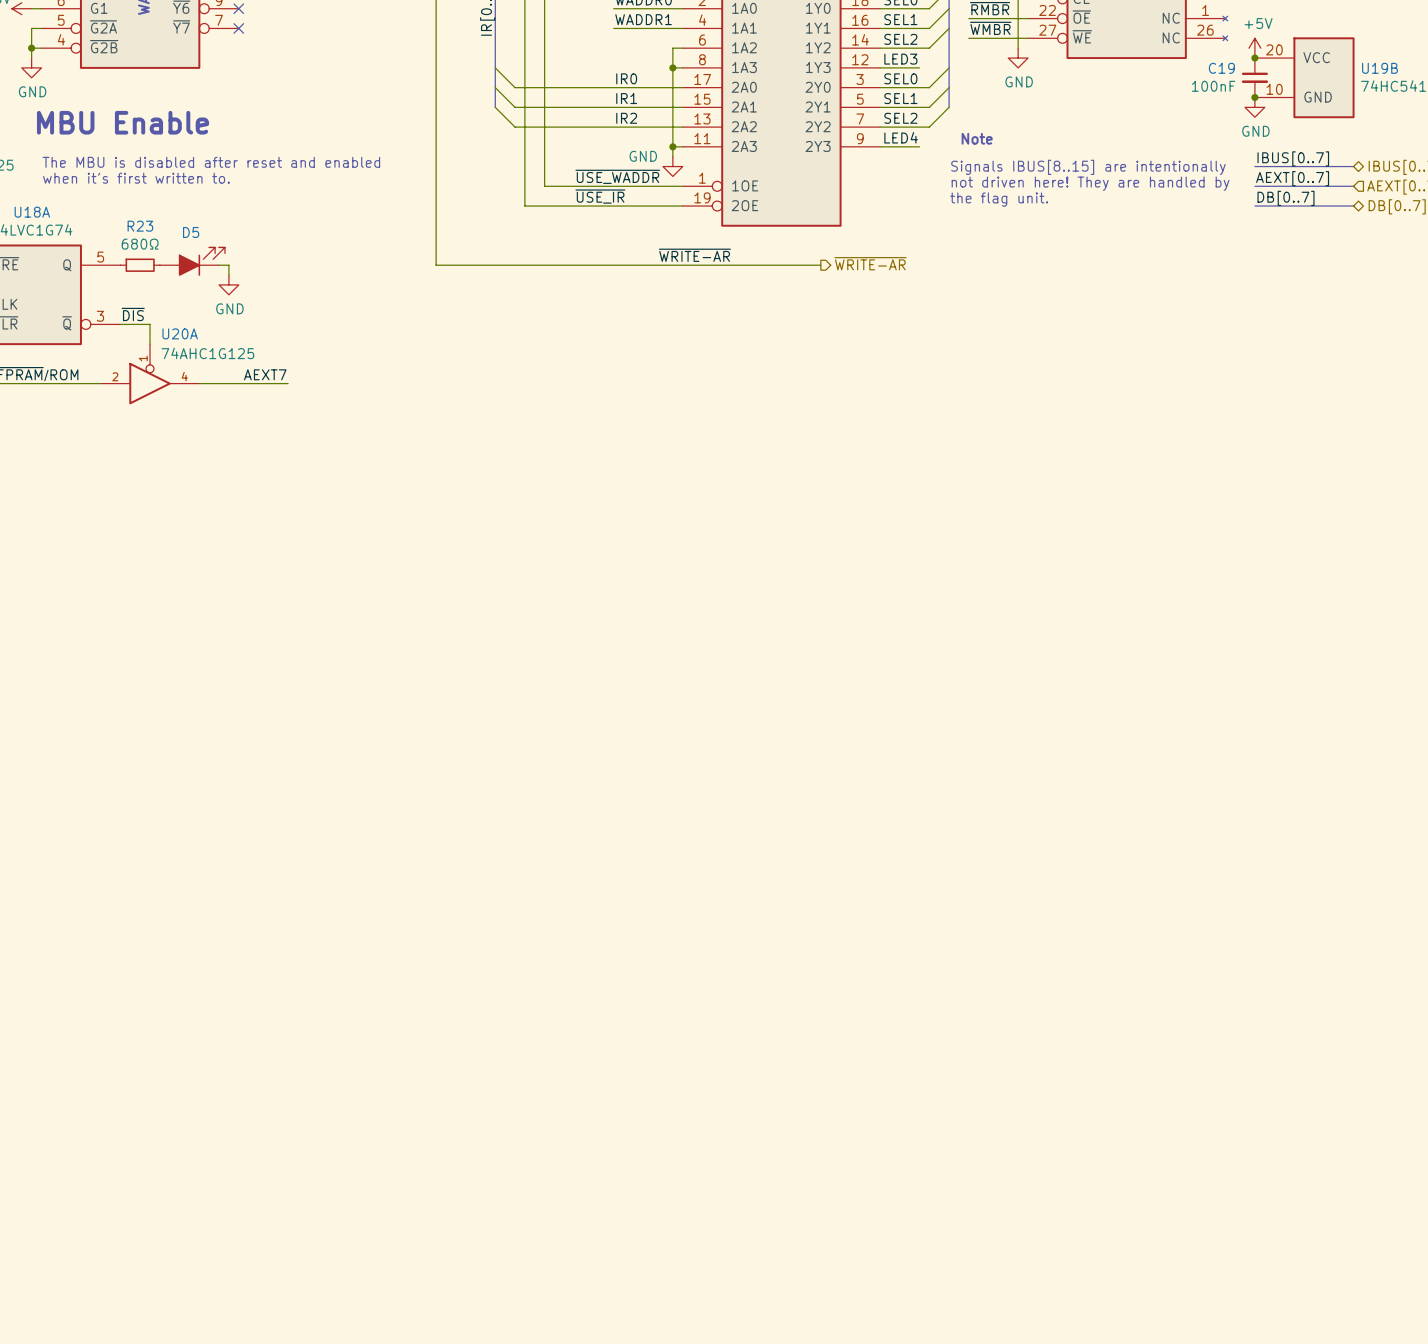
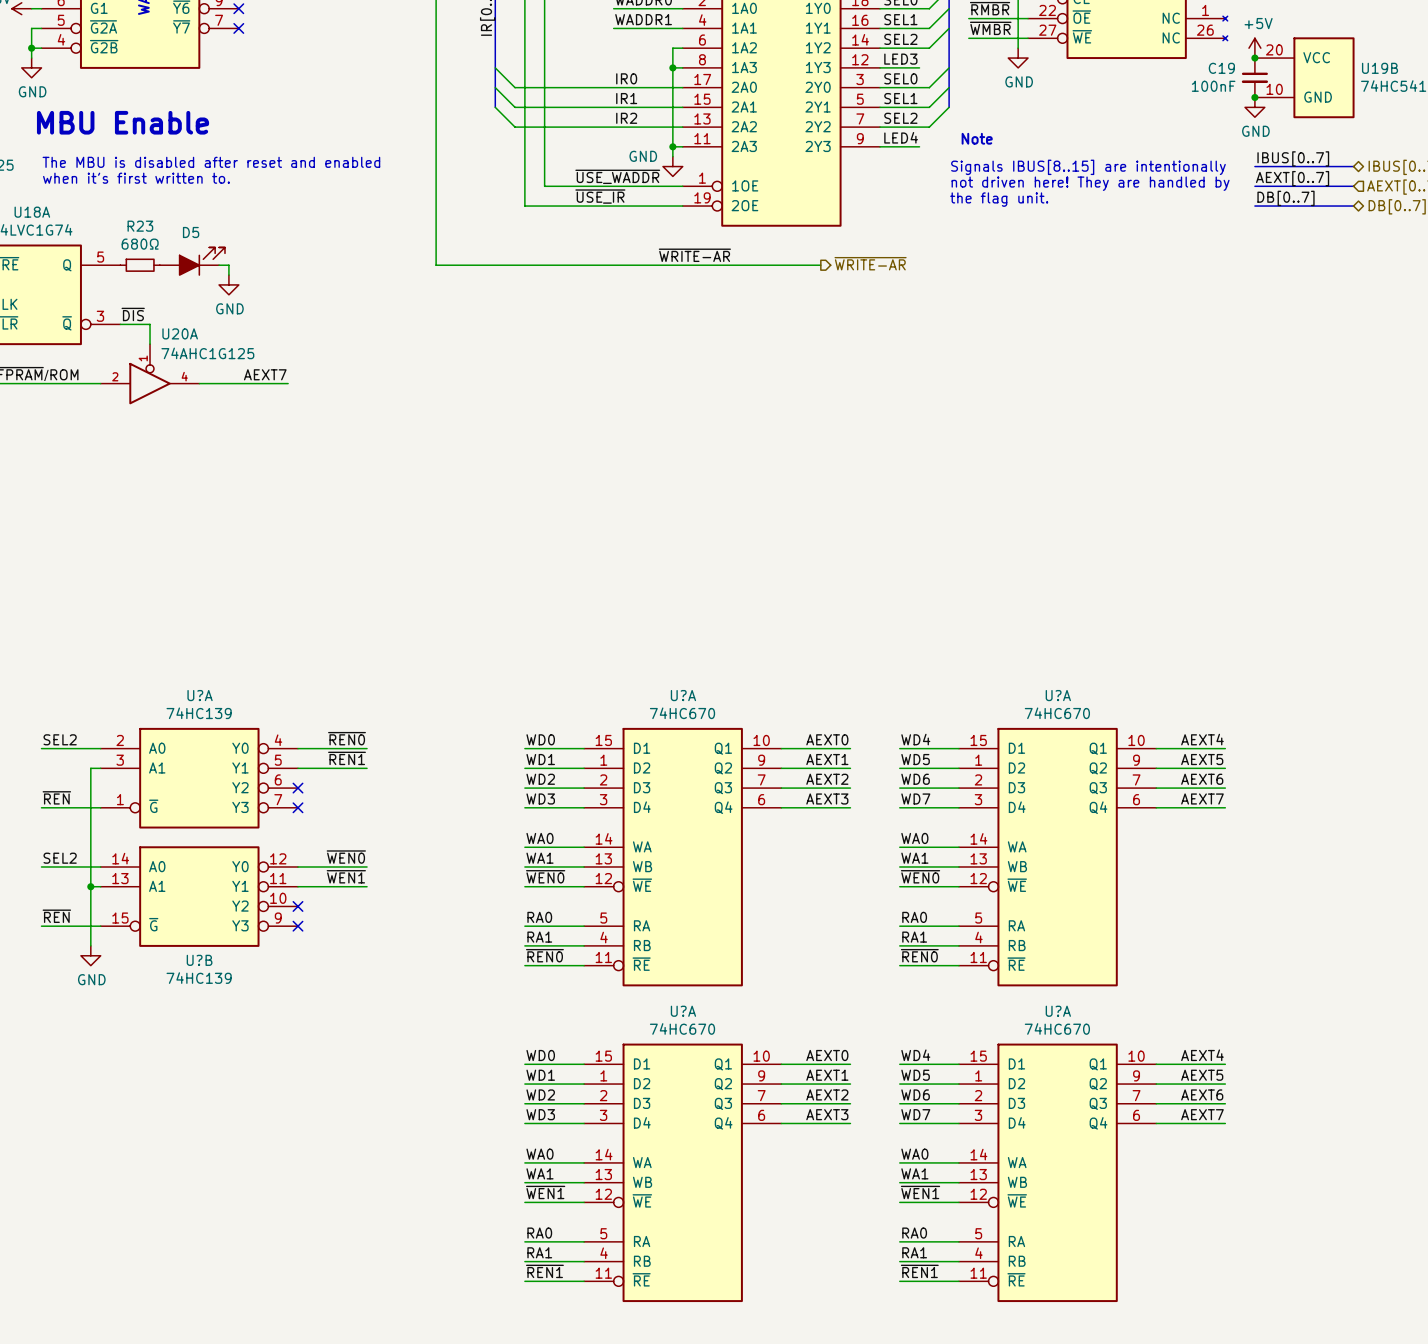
label: none -> ~{REN0} (347, 738)
label: none -> SEL2 (60, 739)
label: none -> WD0 (540, 739)
label: none -> AEXT0 (827, 739)
label: none -> WD4 (915, 739)
label: none -> AEXT4 (1202, 739)
wire: none -> (41, 748) (100, 748)
wire: none -> (297, 748) (367, 748)
wire: none -> (524, 748) (584, 748)
wire: none -> (781, 748) (850, 748)
wire: none -> (899, 748) (958, 748)
wire: none -> (1156, 748) (1225, 748)
label: none -> ~{REN1} (347, 758)
label: none -> WD1 (540, 759)
label: none -> AEXT1 (827, 759)
label: none -> WD5 (915, 759)
label: none -> AEXT5 (1202, 759)
wire: none -> (100, 768) (90, 768) (90, 945)
wire: none -> (297, 768) (367, 768)
wire: none -> (524, 768) (584, 768)
wire: none -> (781, 768) (850, 768)
wire: none -> (899, 768) (958, 768)
wire: none -> (1156, 768) (1225, 768)
U?A: none -> 74HC139 (199, 778)
label: none -> WD2 (540, 779)
label: none -> AEXT2 (827, 779)
label: none -> WD6 (915, 779)
label: none -> AEXT6 (1202, 779)
no-connect mark: none -> (297, 788)
wire: none -> (524, 788) (584, 788)
wire: none -> (781, 788) (850, 788)
wire: none -> (899, 788) (958, 788)
wire: none -> (1156, 788) (1225, 788)
label: none -> ~{REN} (56, 797)
label: none -> WD3 (540, 799)
label: none -> AEXT3 (827, 799)
label: none -> WD7 (915, 799)
label: none -> AEXT7 (1202, 799)
wire: none -> (41, 807) (100, 807)
no-connect mark: none -> (297, 807)
wire: none -> (524, 807) (584, 807)
wire: none -> (781, 807) (850, 807)
wire: none -> (899, 807) (958, 807)
wire: none -> (1156, 807) (1225, 807)
label: none -> WA0 (540, 838)
label: none -> WA0 (914, 838)
wire: none -> (524, 847) (584, 847)
wire: none -> (899, 847) (958, 847)
label: none -> ~{WEN0} (346, 857)
U?A: none -> 74HC670 (682, 857)
U?A: none -> 74HC670 (1057, 857)
label: none -> SEL2 (60, 858)
label: none -> WA1 (540, 858)
label: none -> WA1 (914, 858)
wire: none -> (41, 866) (100, 866)
wire: none -> (297, 866) (367, 866)
wire: none -> (524, 866) (584, 866)
wire: none -> (899, 866) (958, 866)
label: none -> ~{WEN1} (346, 876)
label: none -> ~{WEN0} (545, 876)
label: none -> ~{WEN0} (920, 876)
wire: none -> (90, 886) (100, 886)
junction: none -> (90, 886)
wire: none -> (297, 886) (367, 886)
wire: none -> (524, 886) (584, 886)
wire: none -> (899, 886) (958, 886)
U?B: none -> 74HC139 (199, 896)
no-connect mark: none -> (297, 906)
label: none -> ~{REN} (56, 916)
label: none -> RA0 (539, 917)
label: none -> RA0 (914, 917)
wire: none -> (41, 926) (100, 926)
no-connect mark: none -> (297, 926)
wire: none -> (524, 926) (584, 926)
wire: none -> (899, 926) (958, 926)
label: none -> RA1 (539, 937)
label: none -> RA1 (914, 937)
wire: none -> (524, 945) (584, 945)
wire: none -> (899, 945) (958, 945)
power symbol: none -> GND (90, 955)
label: none -> ~{REN0} (544, 955)
label: none -> ~{REN0} (919, 955)
wire: none -> (524, 965) (584, 965)
wire: none -> (899, 965) (958, 965)
label: none -> WD0 (540, 1055)
label: none -> AEXT0 (827, 1055)
label: none -> WD4 (915, 1055)
label: none -> AEXT4 (1202, 1055)
wire: none -> (524, 1064) (584, 1064)
wire: none -> (781, 1064) (850, 1064)
wire: none -> (899, 1064) (958, 1064)
wire: none -> (1156, 1064) (1225, 1064)
label: none -> WD1 (540, 1075)
label: none -> AEXT1 (827, 1075)
label: none -> WD5 (915, 1075)
label: none -> AEXT5 (1202, 1075)
wire: none -> (524, 1084) (584, 1084)
wire: none -> (781, 1084) (850, 1084)
wire: none -> (899, 1084) (958, 1084)
wire: none -> (1156, 1084) (1225, 1084)
label: none -> WD2 (540, 1094)
label: none -> AEXT2 (827, 1094)
label: none -> WD6 (915, 1094)
label: none -> AEXT6 (1202, 1094)
wire: none -> (524, 1103) (584, 1103)
wire: none -> (781, 1103) (850, 1103)
wire: none -> (899, 1103) (958, 1103)
wire: none -> (1156, 1103) (1225, 1103)
label: none -> WD3 (540, 1114)
label: none -> AEXT3 (827, 1114)
label: none -> WD7 (915, 1114)
label: none -> AEXT7 (1202, 1114)
wire: none -> (524, 1123) (584, 1123)
wire: none -> (781, 1123) (850, 1123)
wire: none -> (899, 1123) (958, 1123)
wire: none -> (1156, 1123) (1225, 1123)
label: none -> WA0 (540, 1154)
label: none -> WA0 (914, 1154)
wire: none -> (524, 1162) (584, 1162)
wire: none -> (899, 1162) (958, 1162)
U?A: none -> 74HC670 (682, 1172)
U?A: none -> 74HC670 (1057, 1172)
label: none -> WA1 (540, 1173)
label: none -> WA1 (914, 1173)
wire: none -> (524, 1182) (584, 1182)
wire: none -> (899, 1182) (958, 1182)
label: none -> ~{WEN1} (545, 1192)
label: none -> ~{WEN1} (920, 1192)
wire: none -> (524, 1202) (584, 1202)
wire: none -> (899, 1202) (958, 1202)
label: none -> RA0 (539, 1233)
label: none -> RA0 (914, 1233)
wire: none -> (524, 1241) (584, 1241)
wire: none -> (899, 1241) (958, 1241)
label: none -> RA1 (539, 1252)
label: none -> RA1 (914, 1252)
wire: none -> (524, 1261) (584, 1261)
wire: none -> (899, 1261) (958, 1261)
label: none -> ~{REN1} (544, 1271)
label: none -> ~{REN1} (919, 1271)
wire: none -> (524, 1281) (584, 1281)
wire: none -> (899, 1281) (958, 1281)

